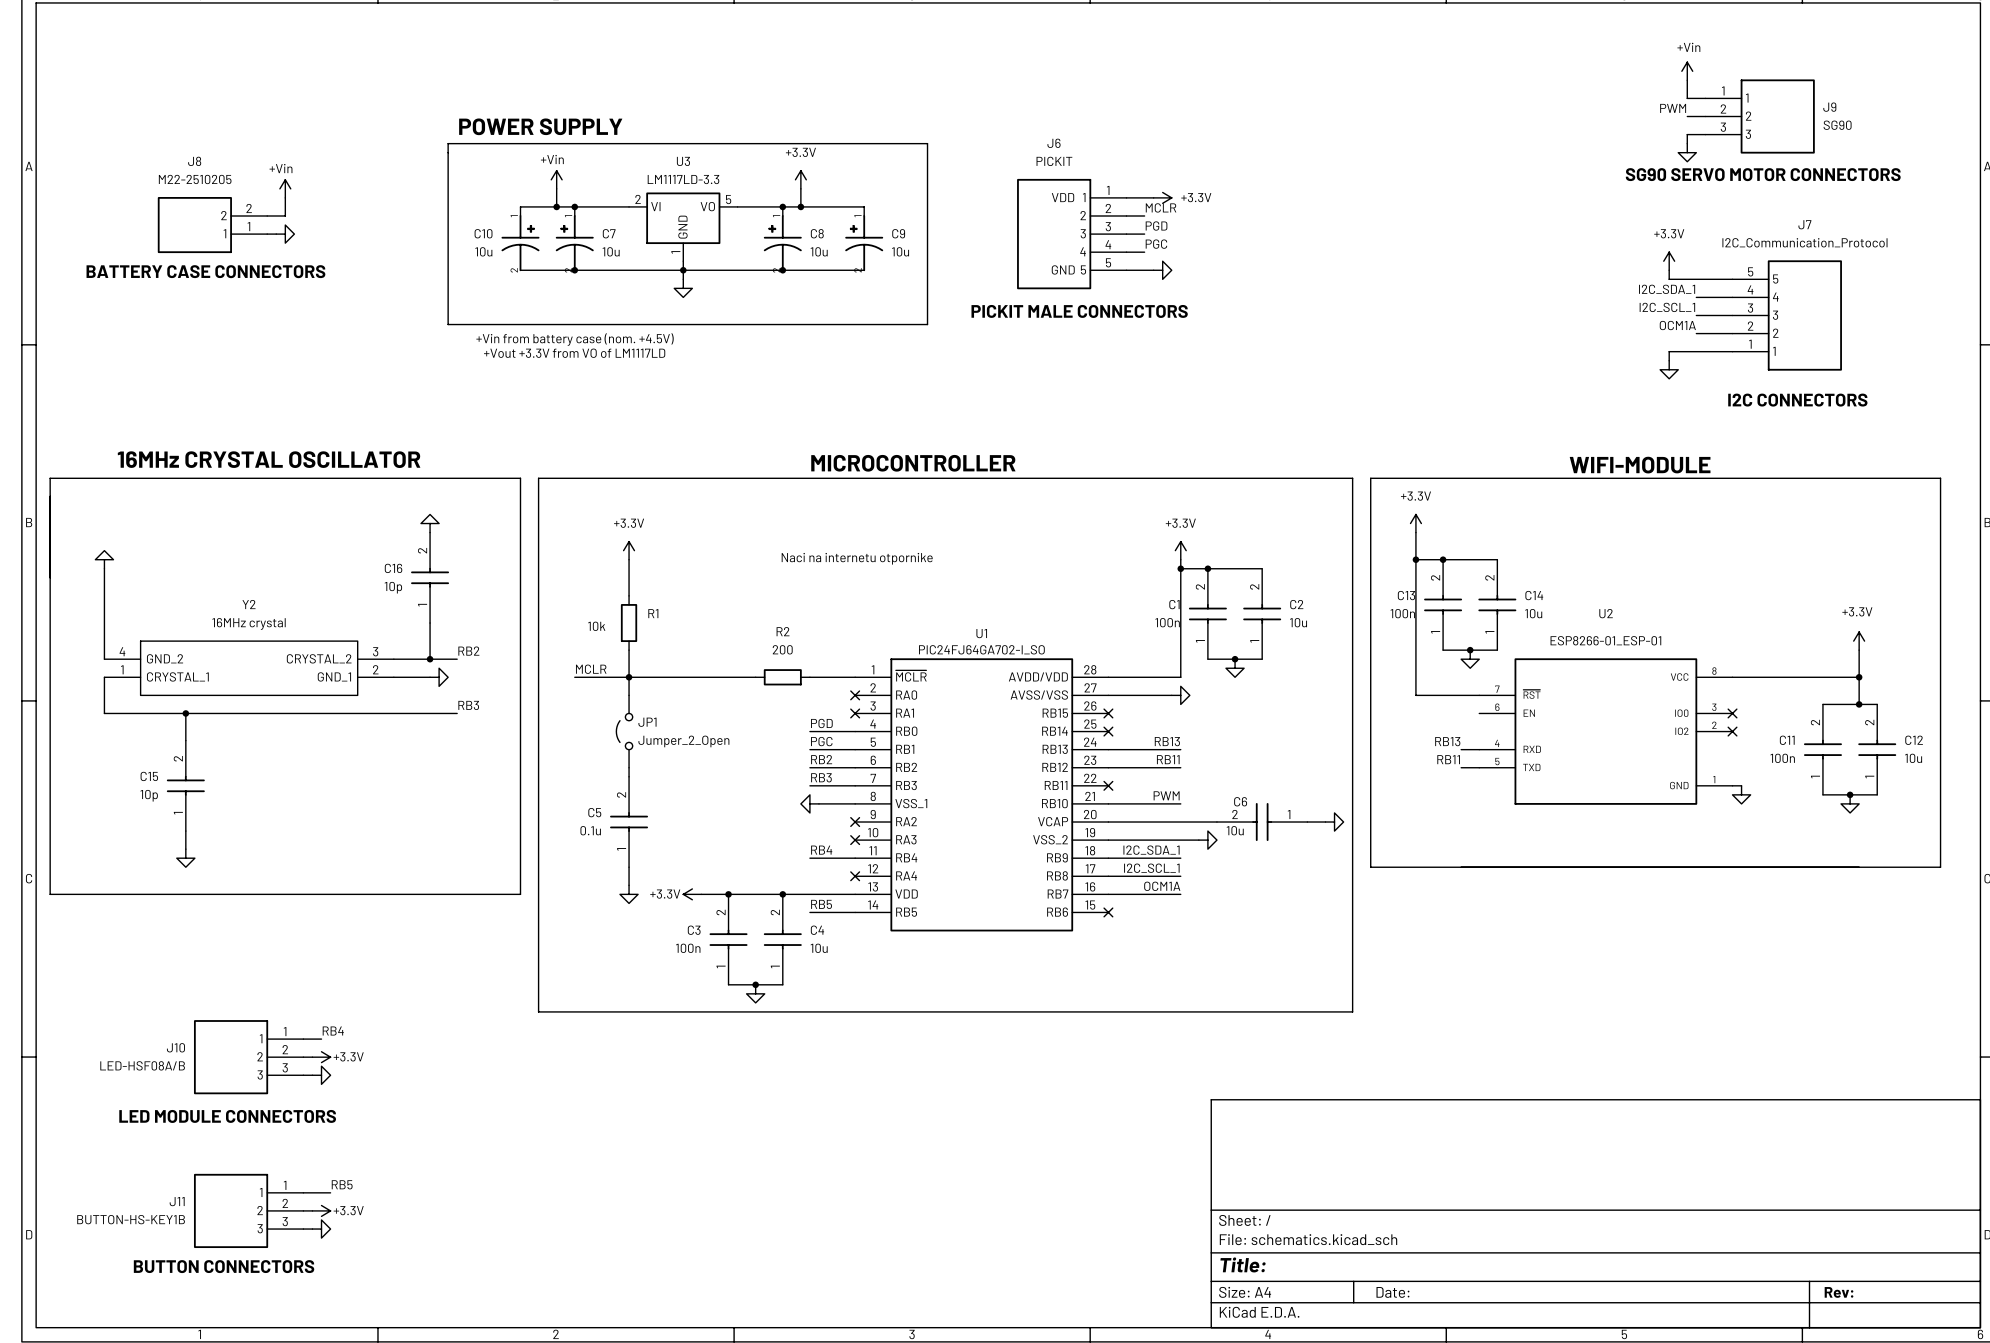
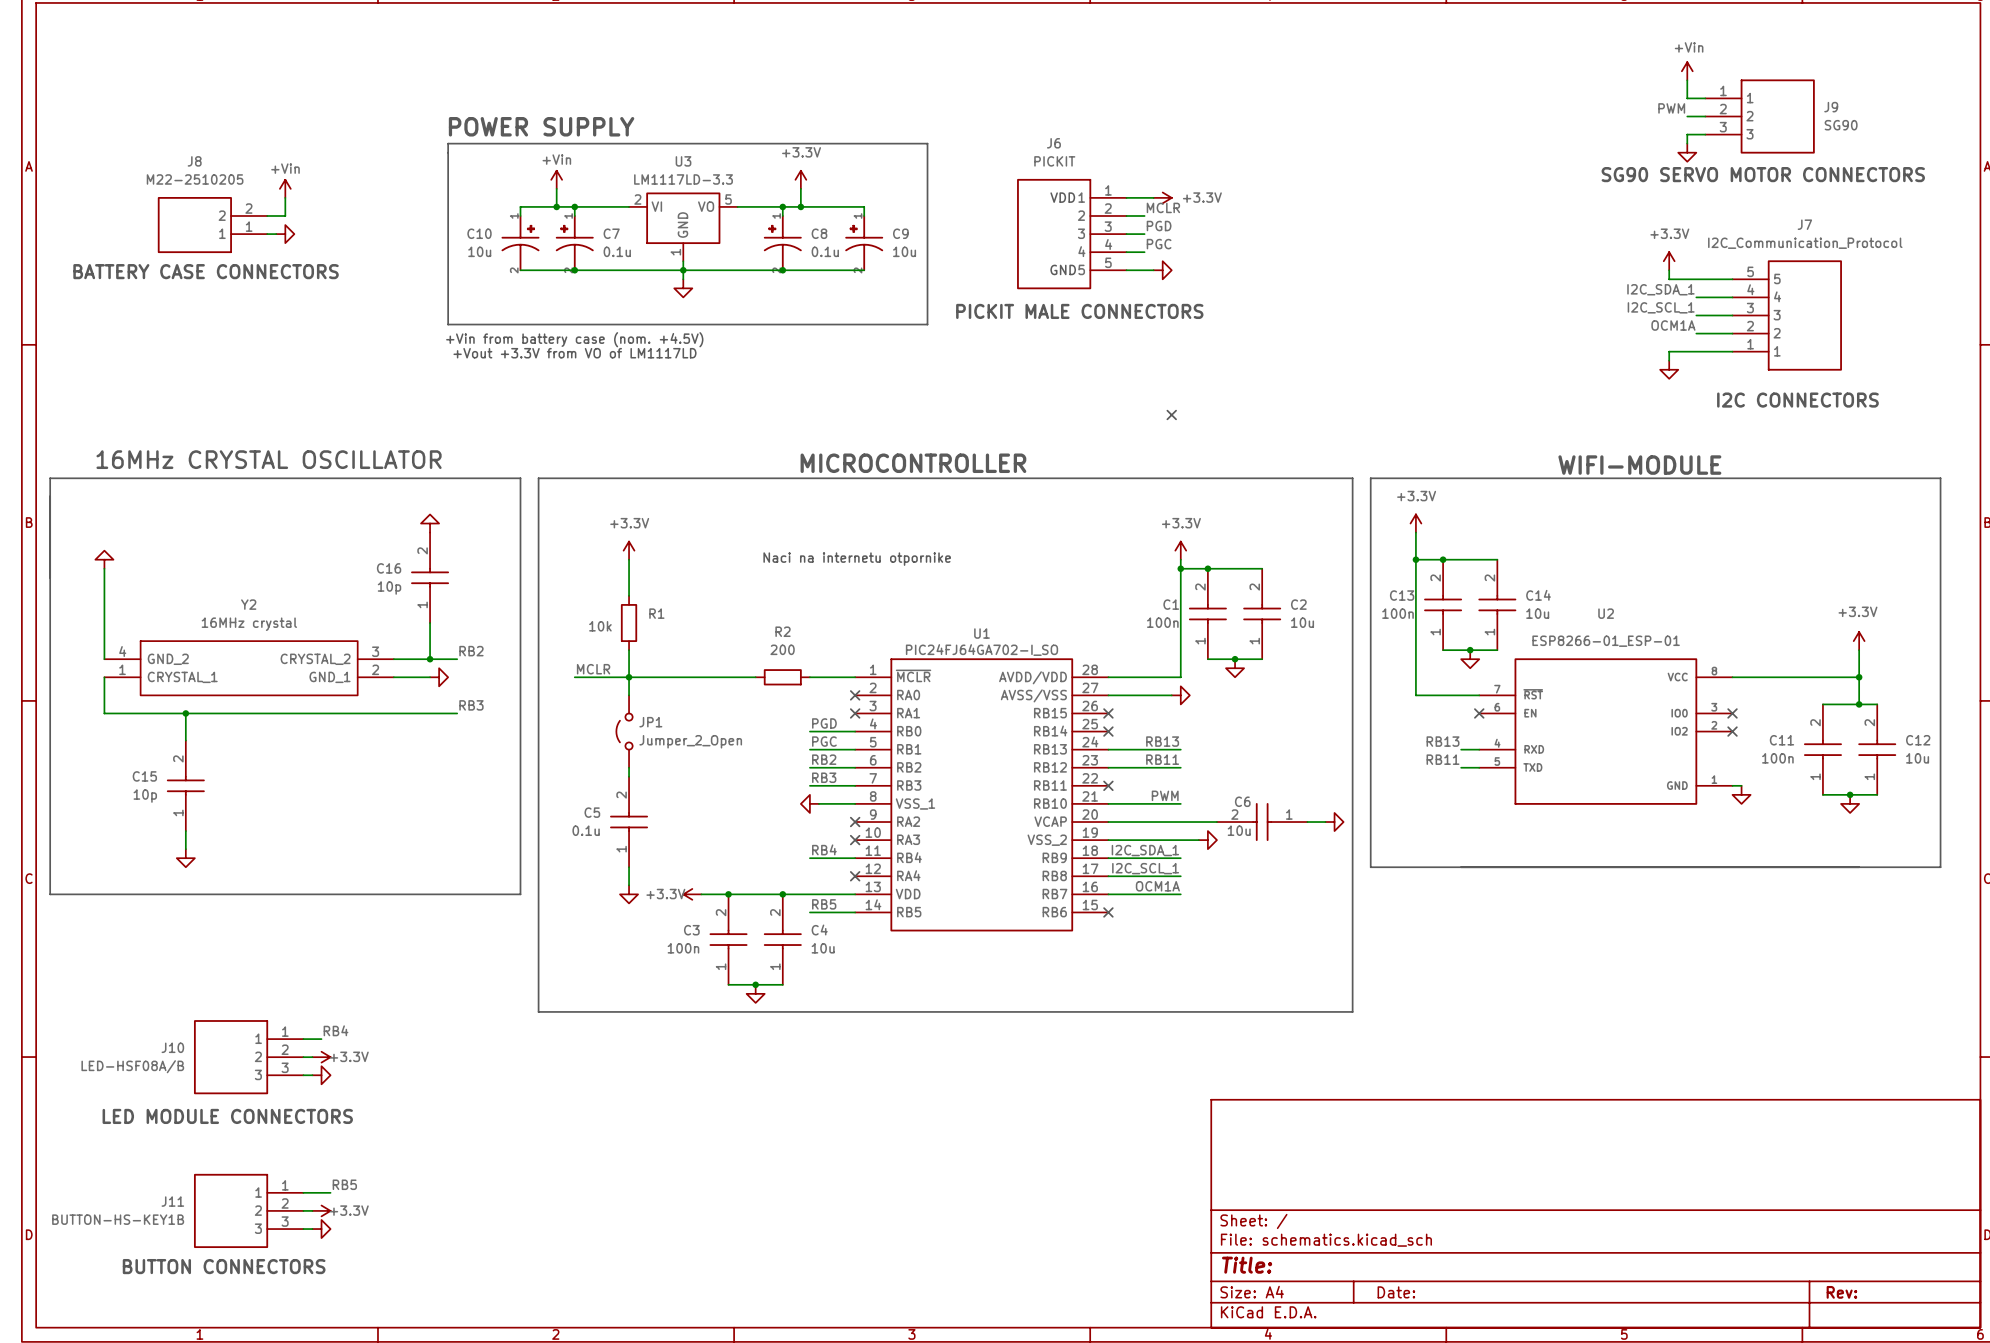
C7 value: 10u (611, 251) -> 0.1u (617, 251)
C8 value: 10u (819, 251) -> 0.1u (825, 251)
no-connect mark: none -> (1171, 414)
no-connect mark: none -> (1479, 713)

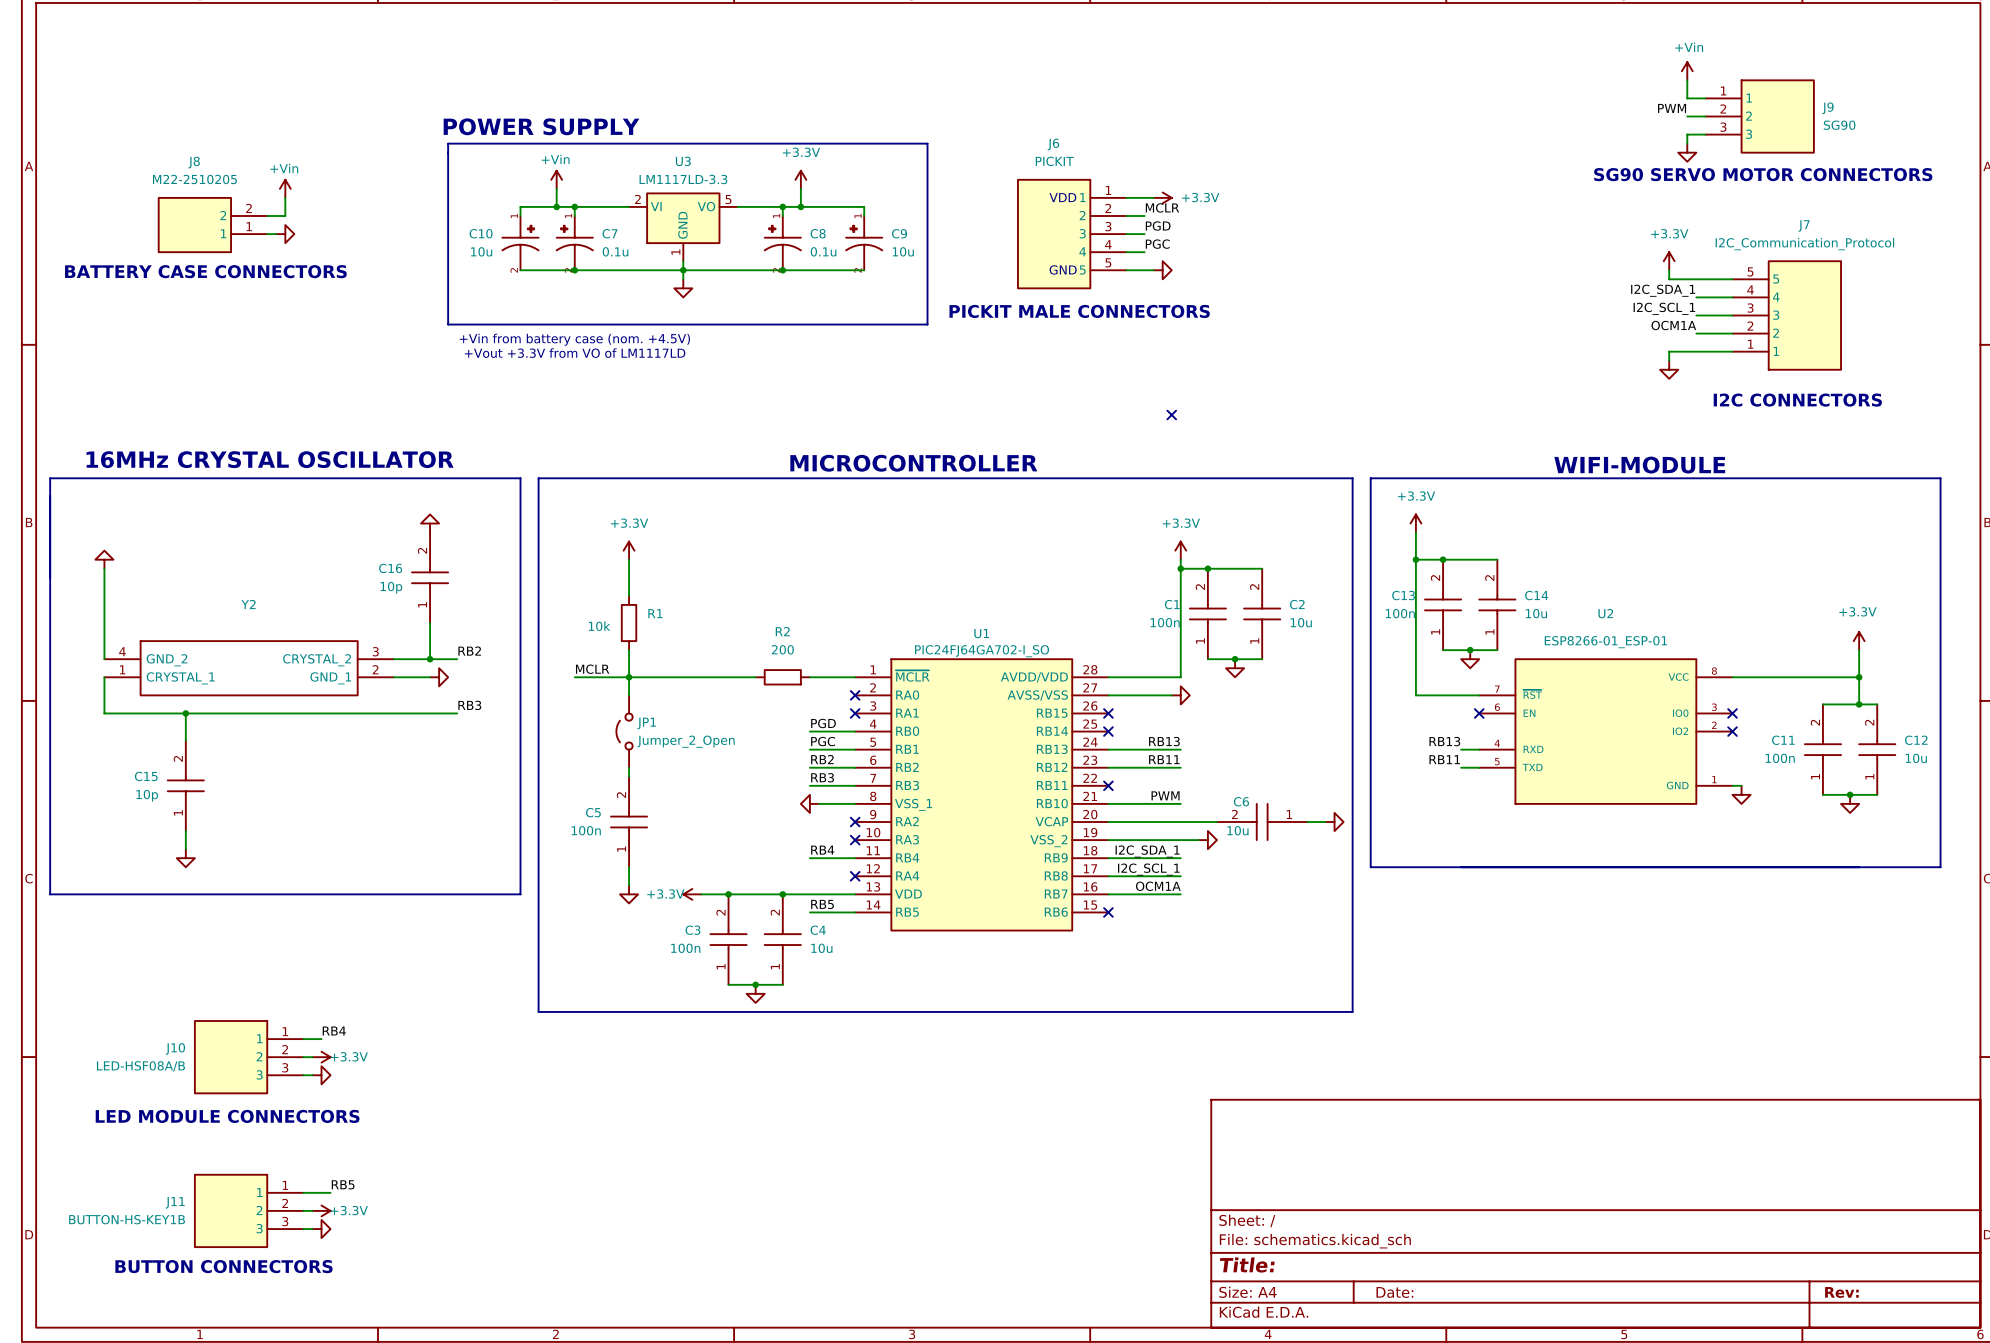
text: Naci na internetu otpornike (857, 559) -> none
Y2 value: 16MHz crystal (249, 624) -> none
C5 value: 0.1u (586, 830) -> 100n (586, 830)

